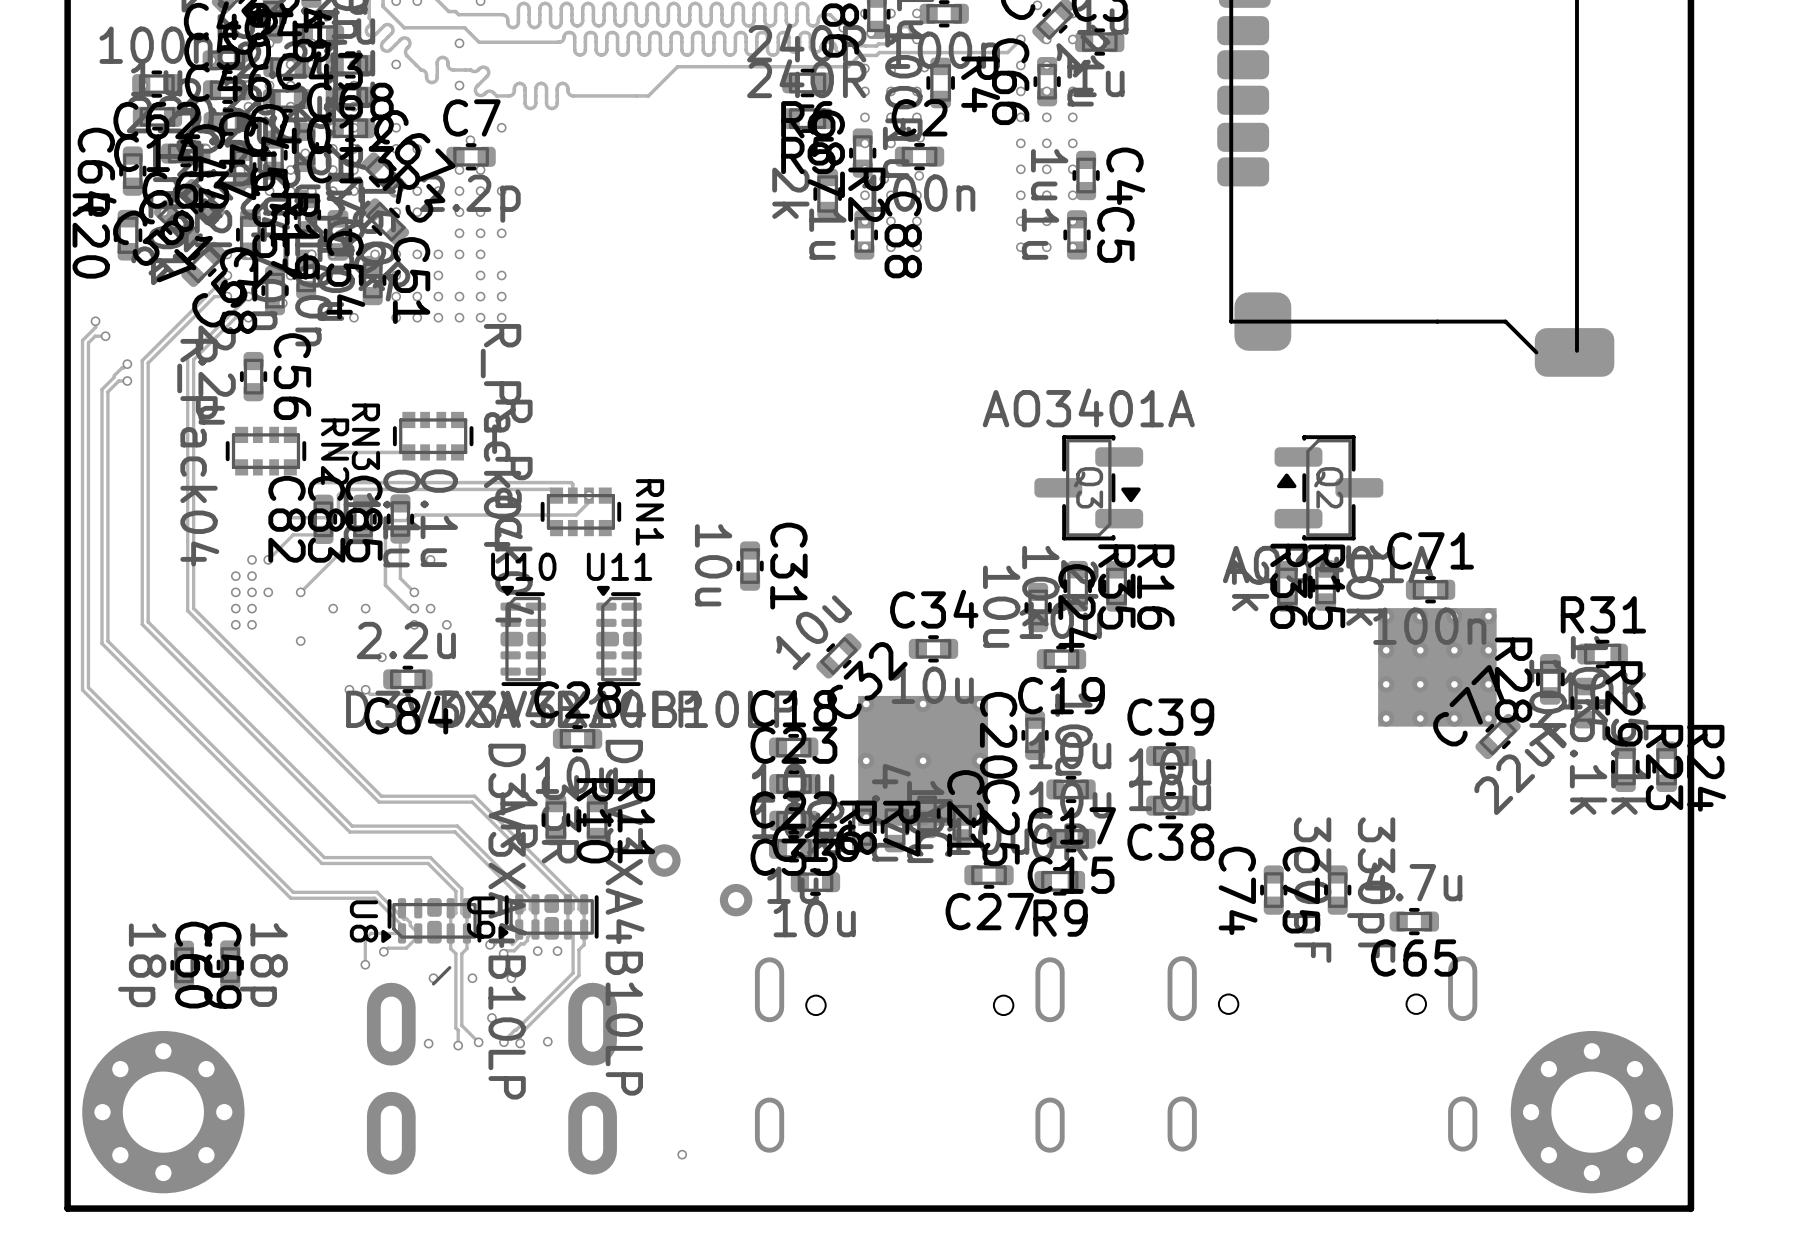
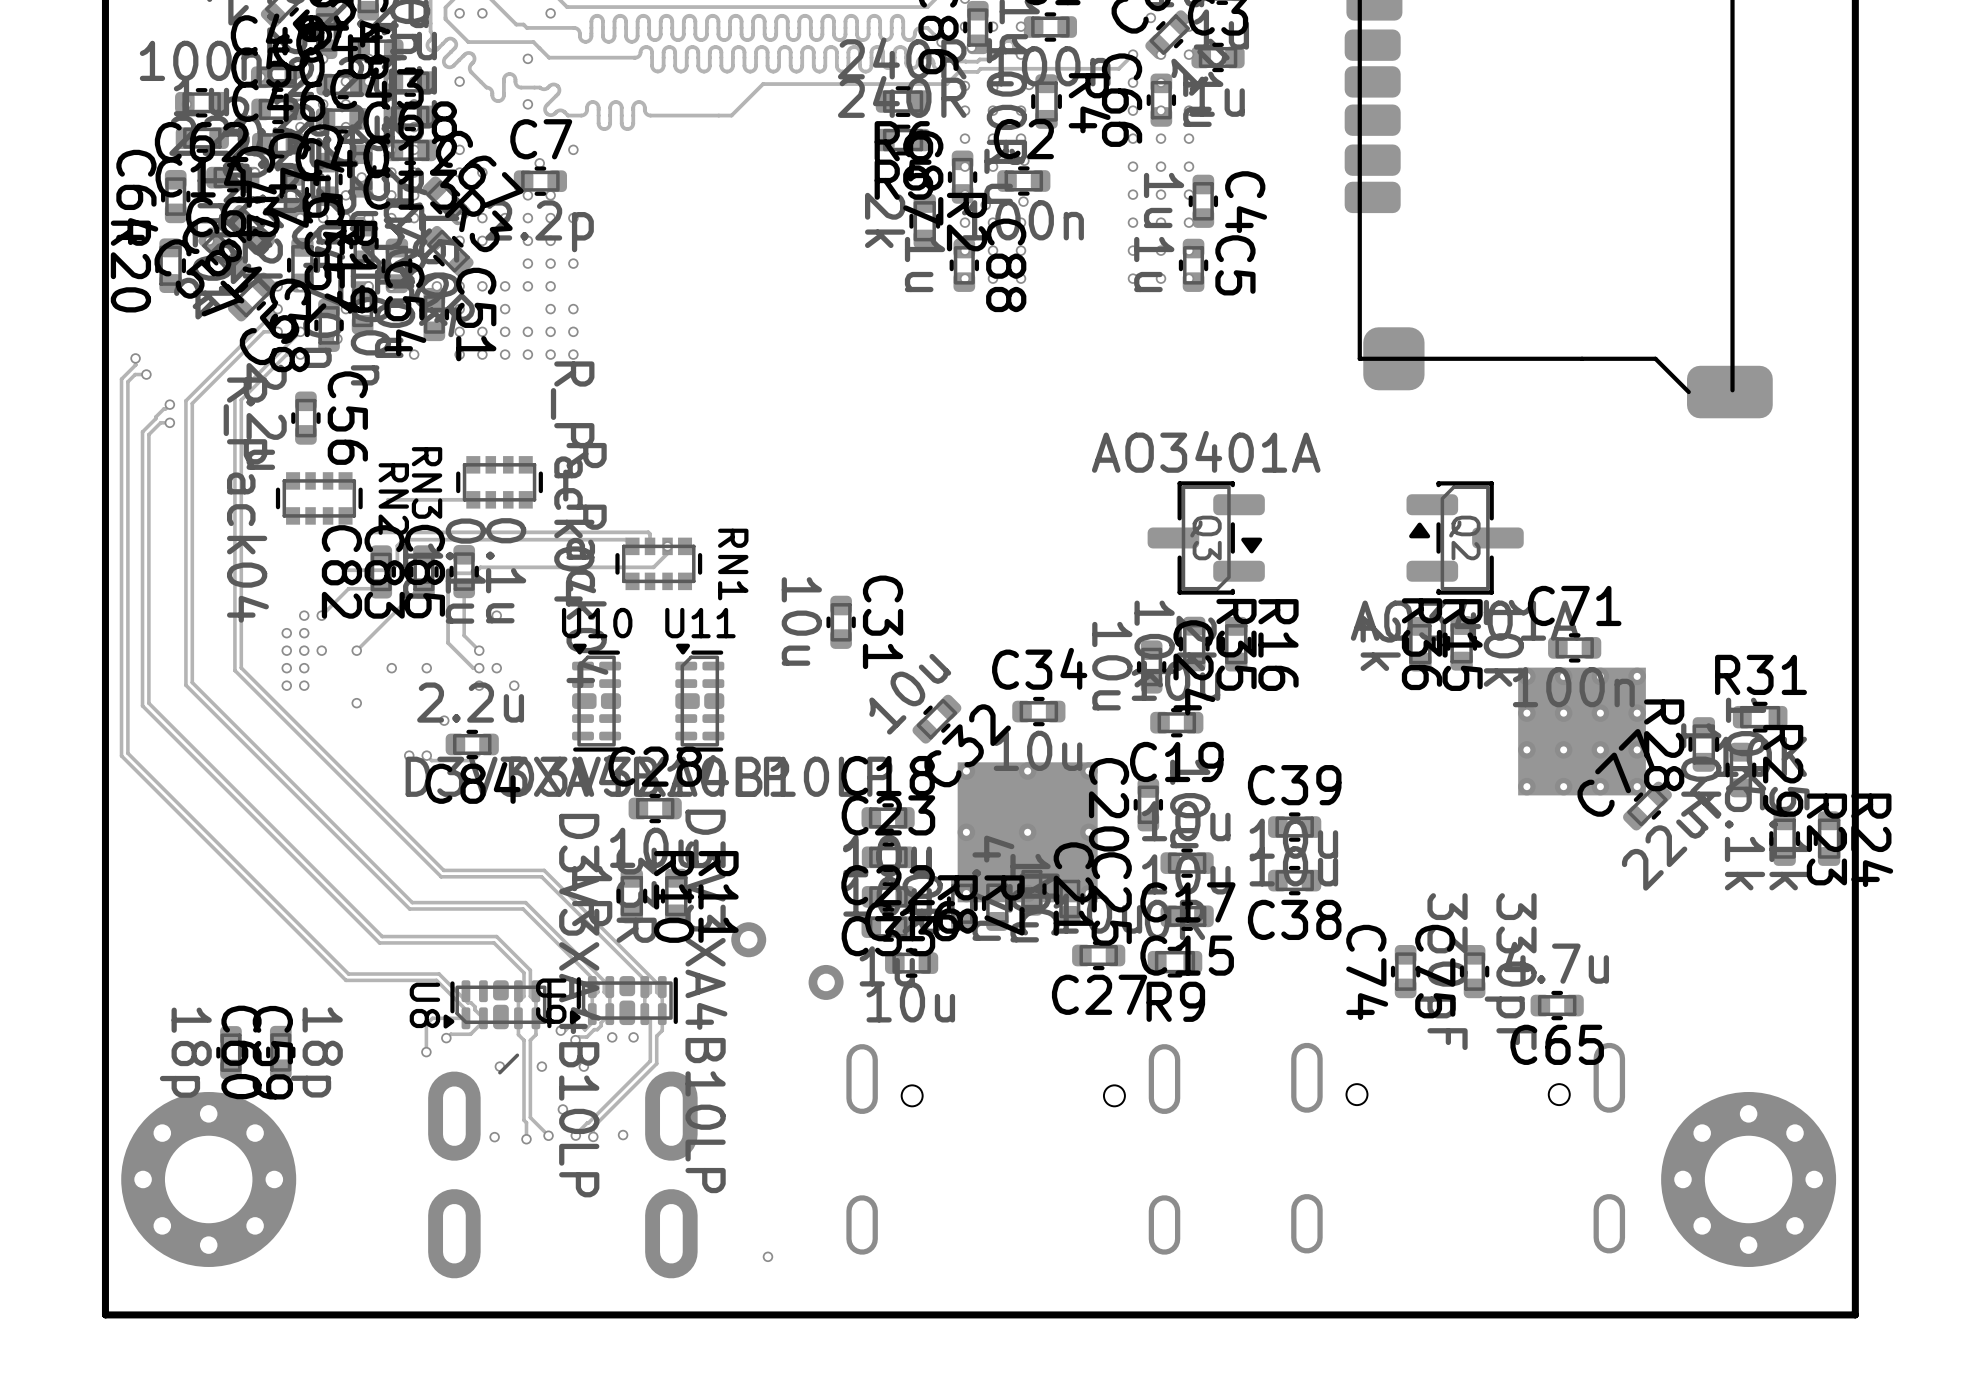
part position: (163, 1112) -> (208, 1179)
part position: (1591, 1112) -> (1748, 1179)

